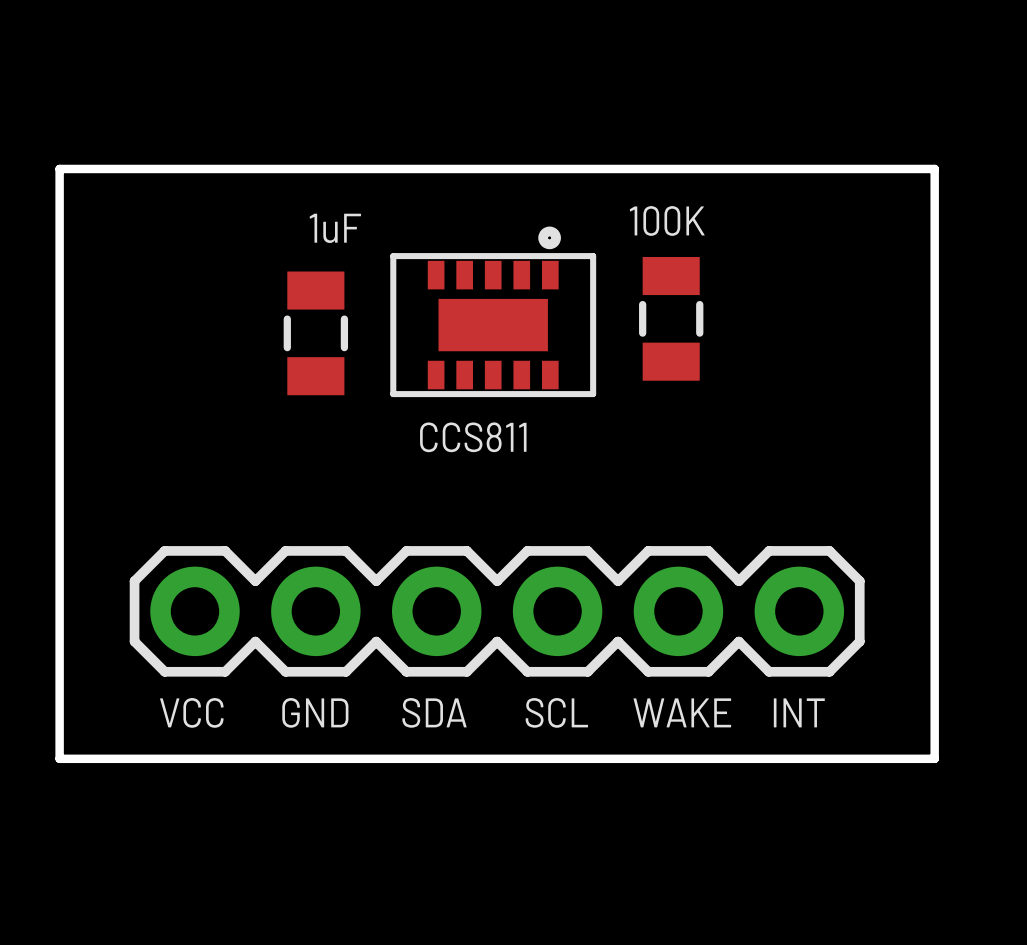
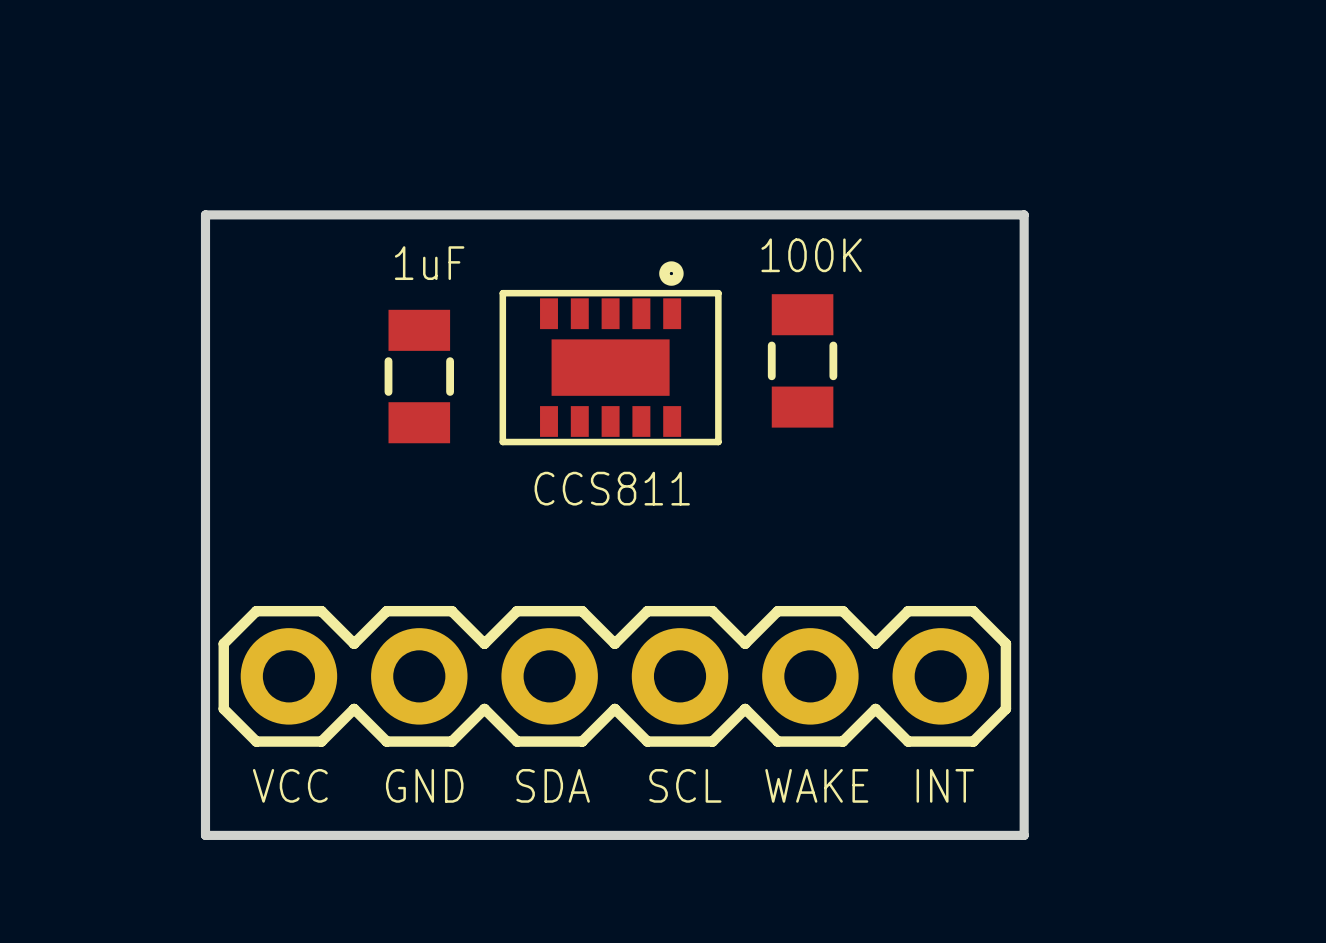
board edge: (117, 758) (59, 758) (59, 168) (934, 168) (934, 758) (876, 758) -> (205, 835) (205, 214) (1024, 214) (1024, 835)

